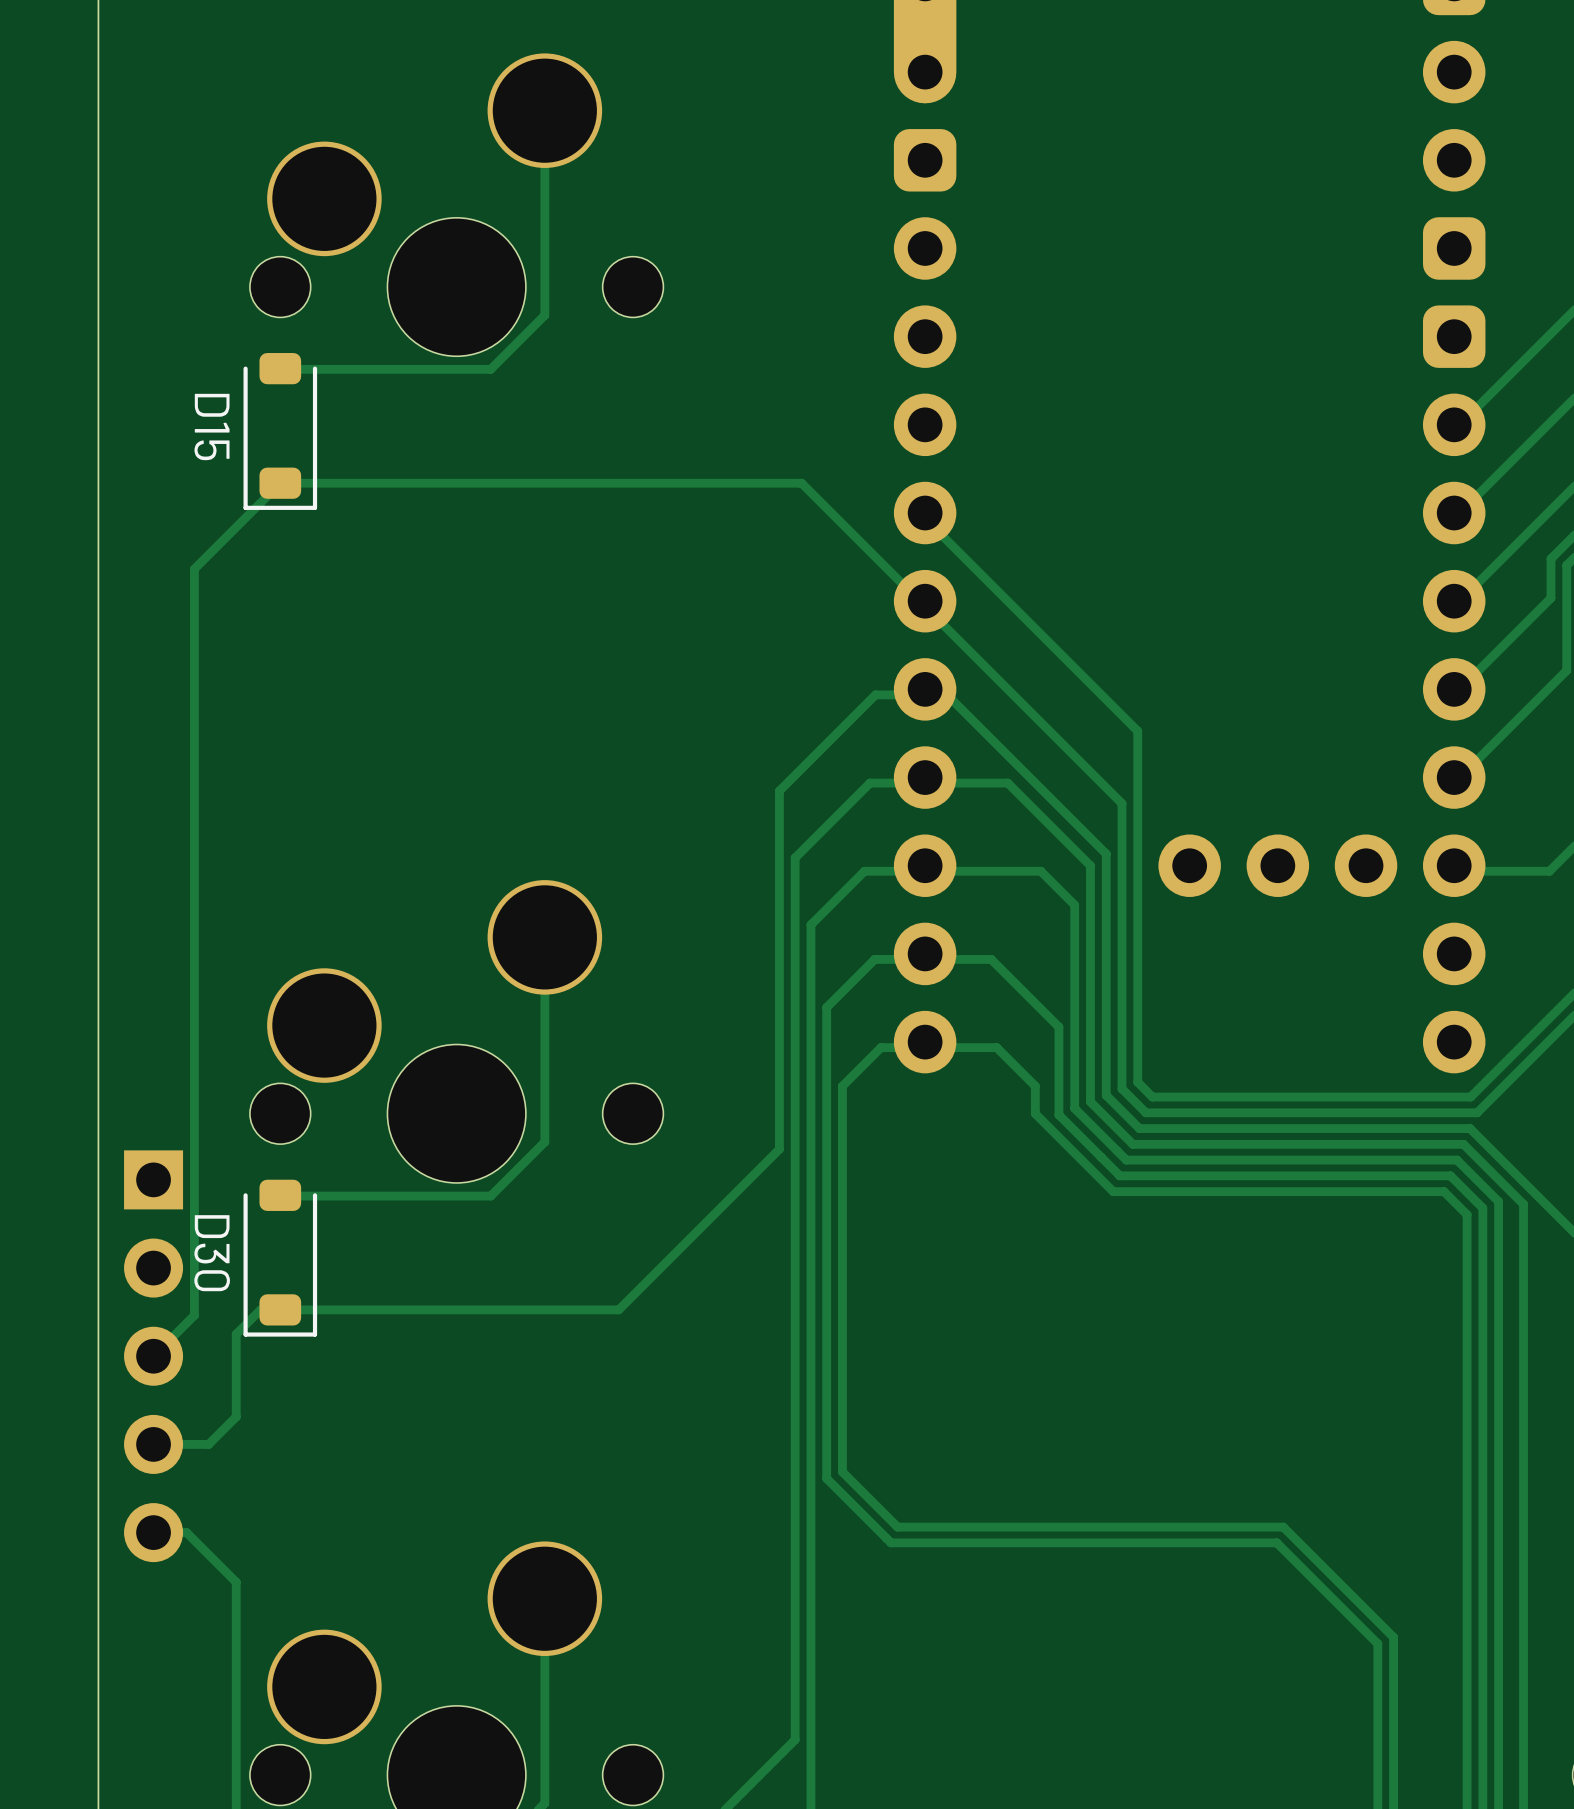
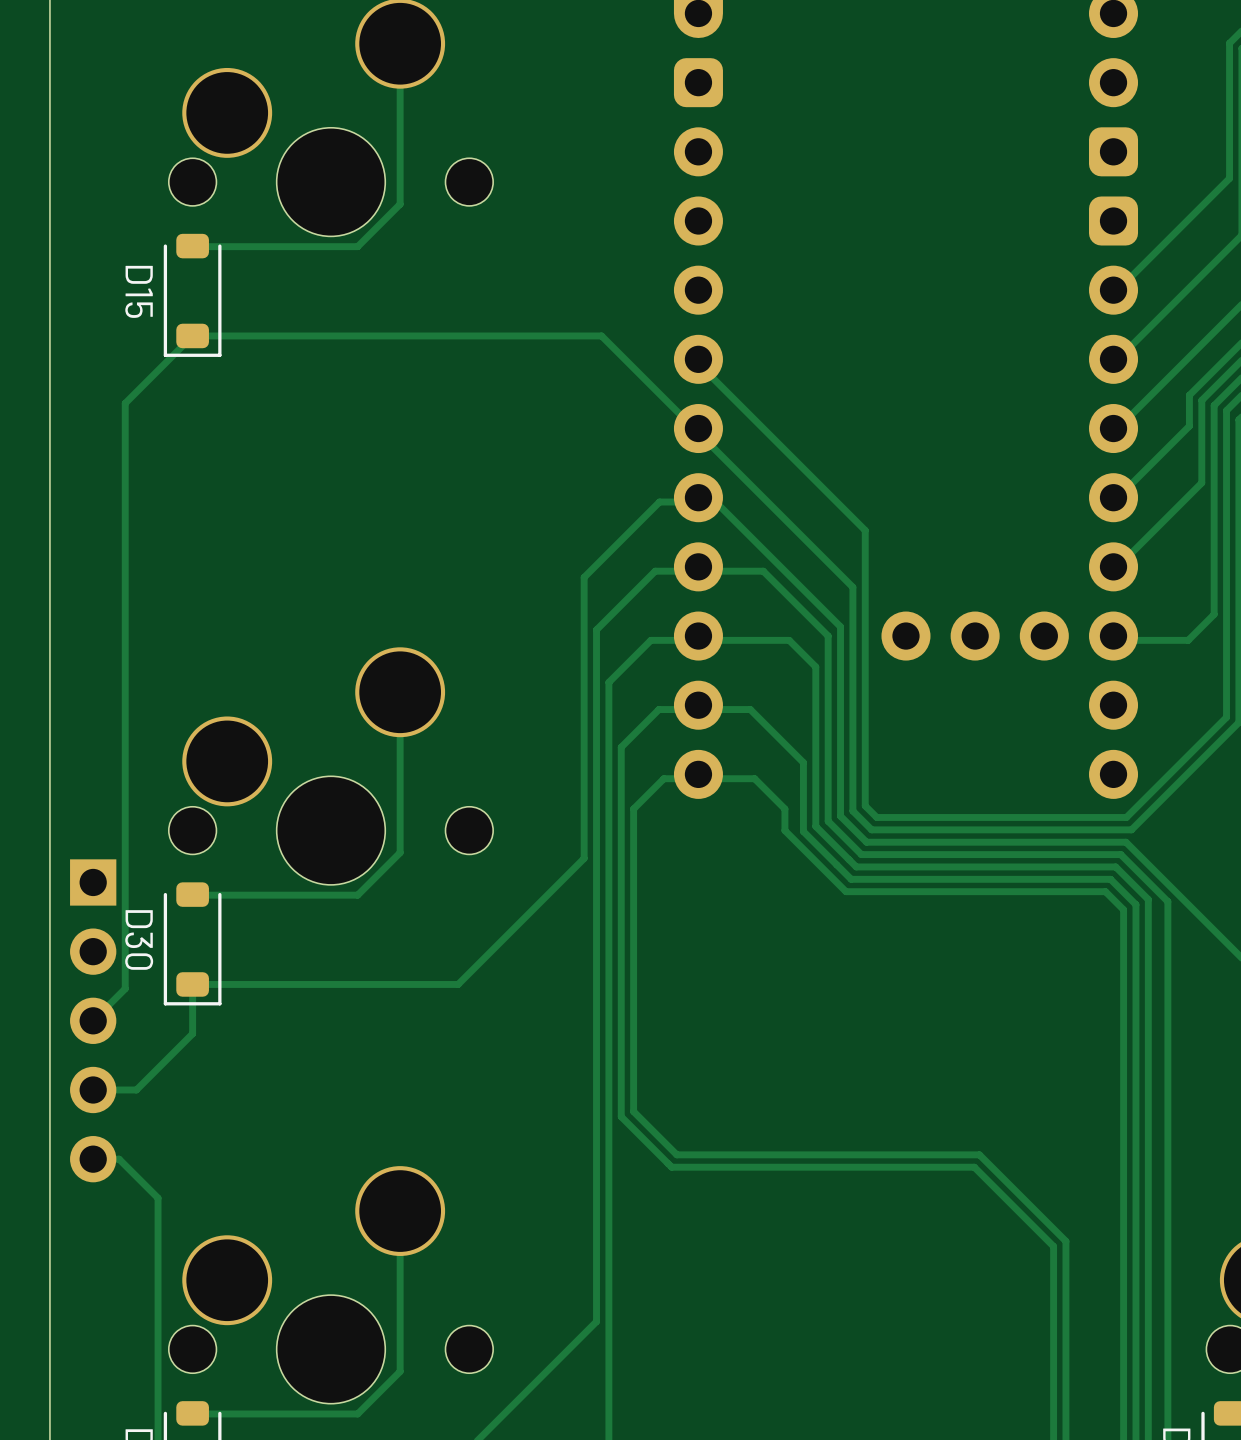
track: (280, 1309) (260, 1309) (236, 1334) (236, 1416) -> (192, 990) (192, 1033) (158, 1068)

